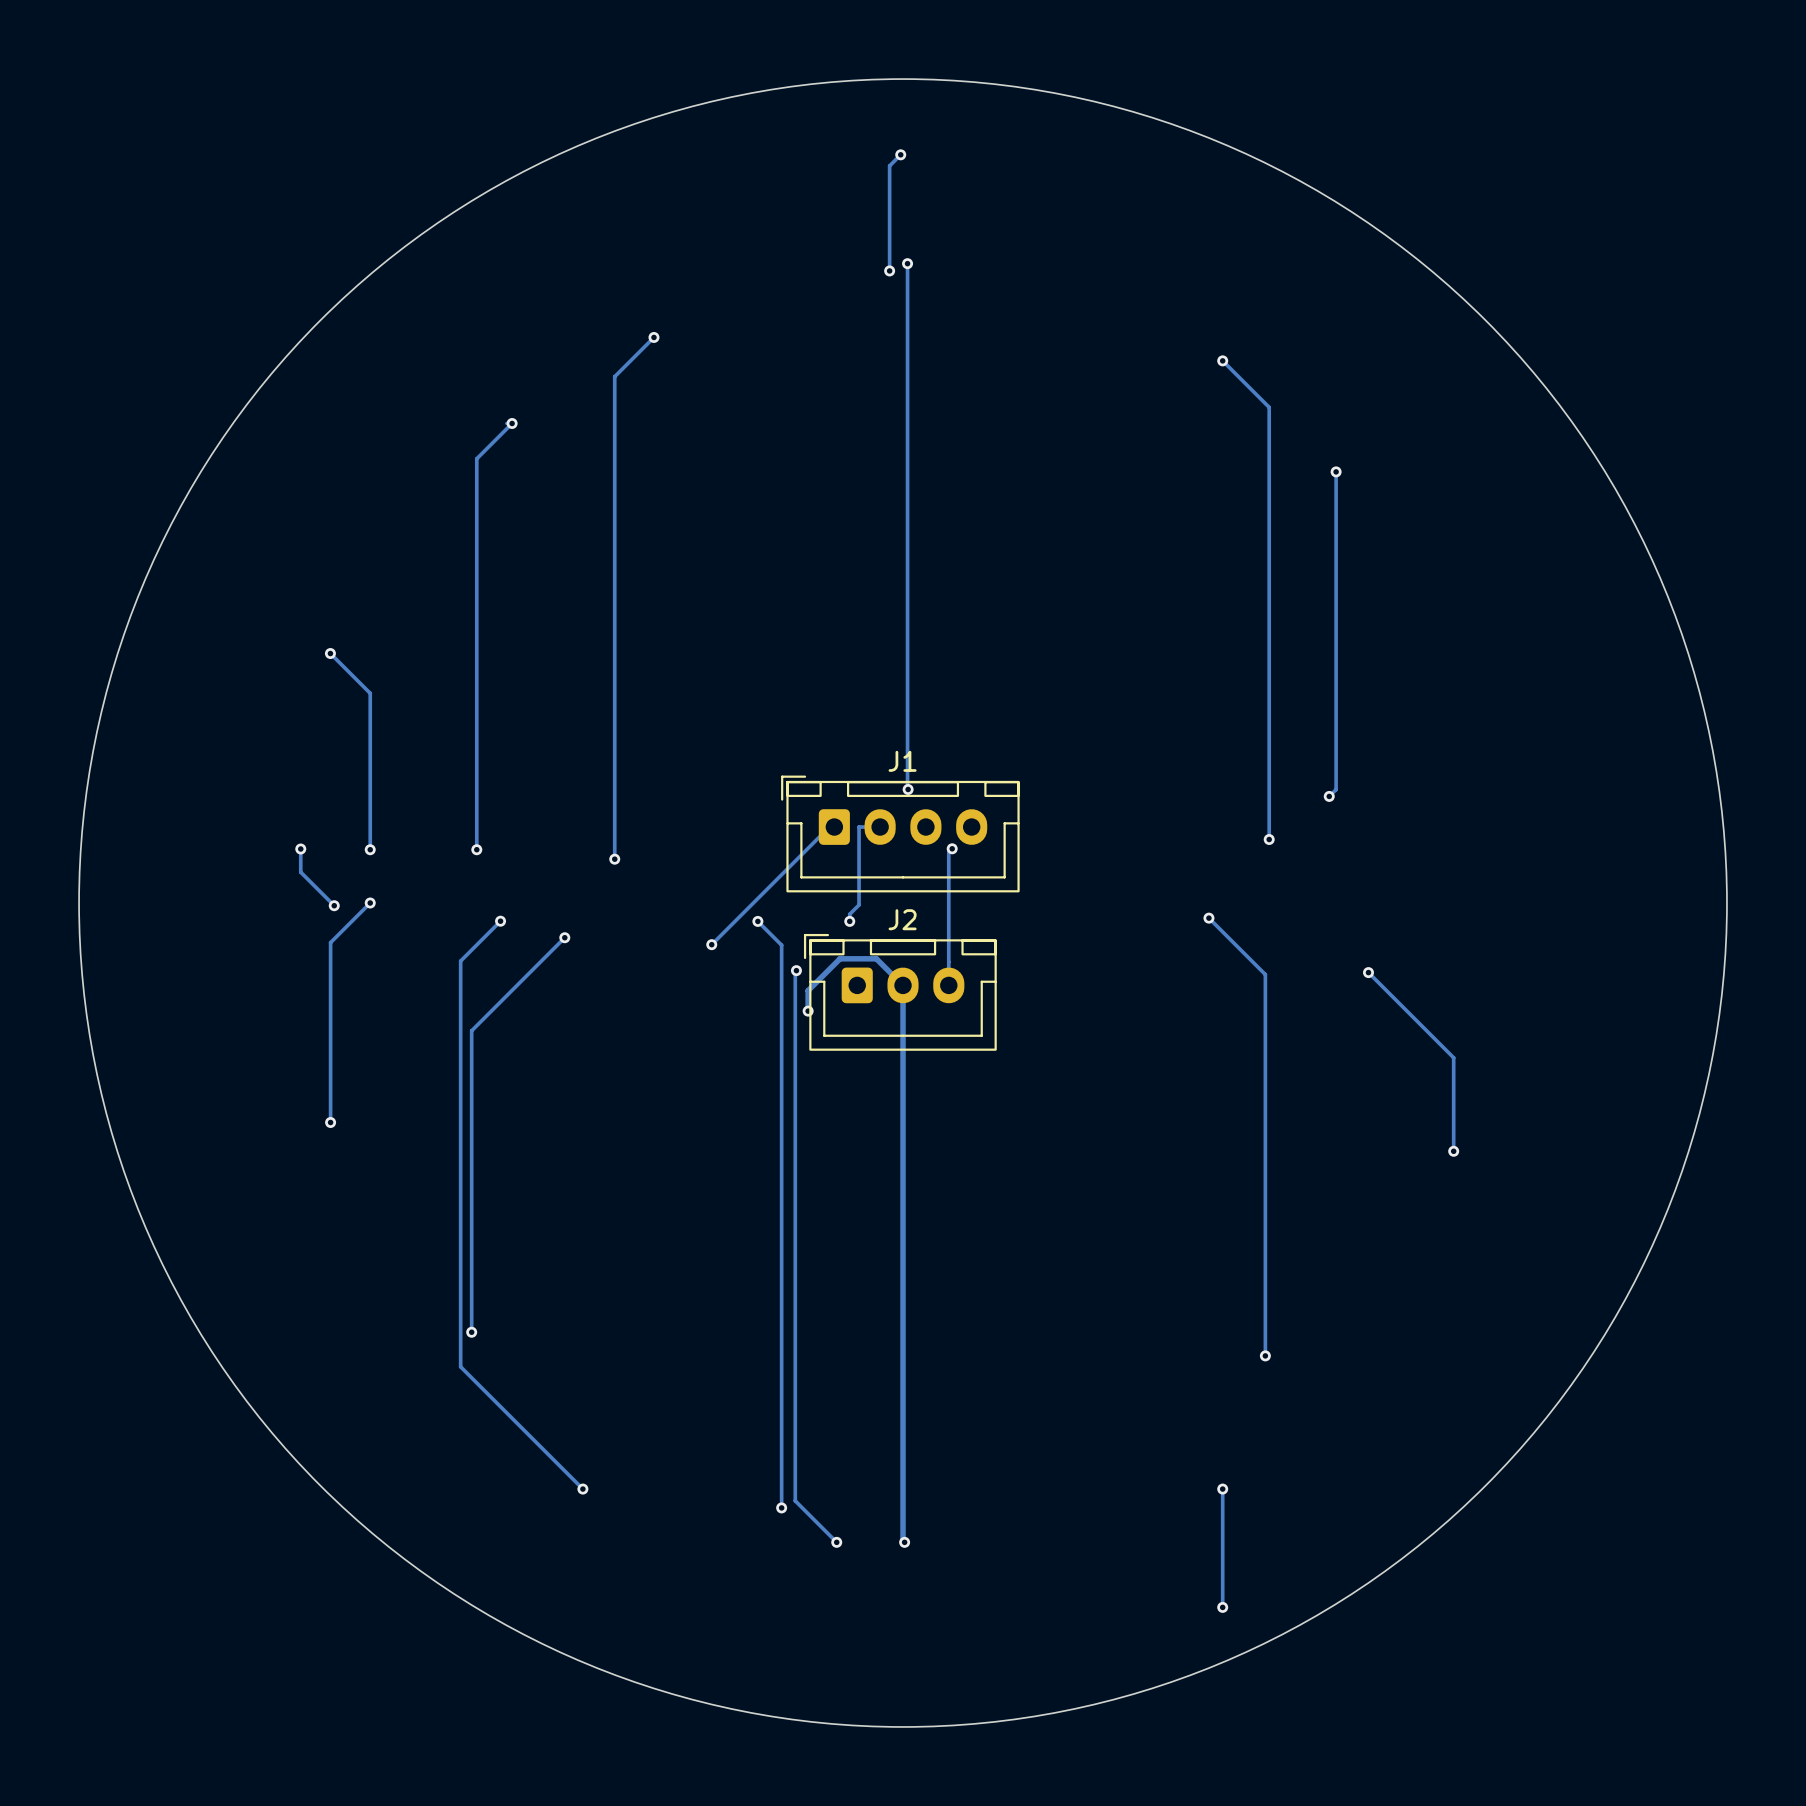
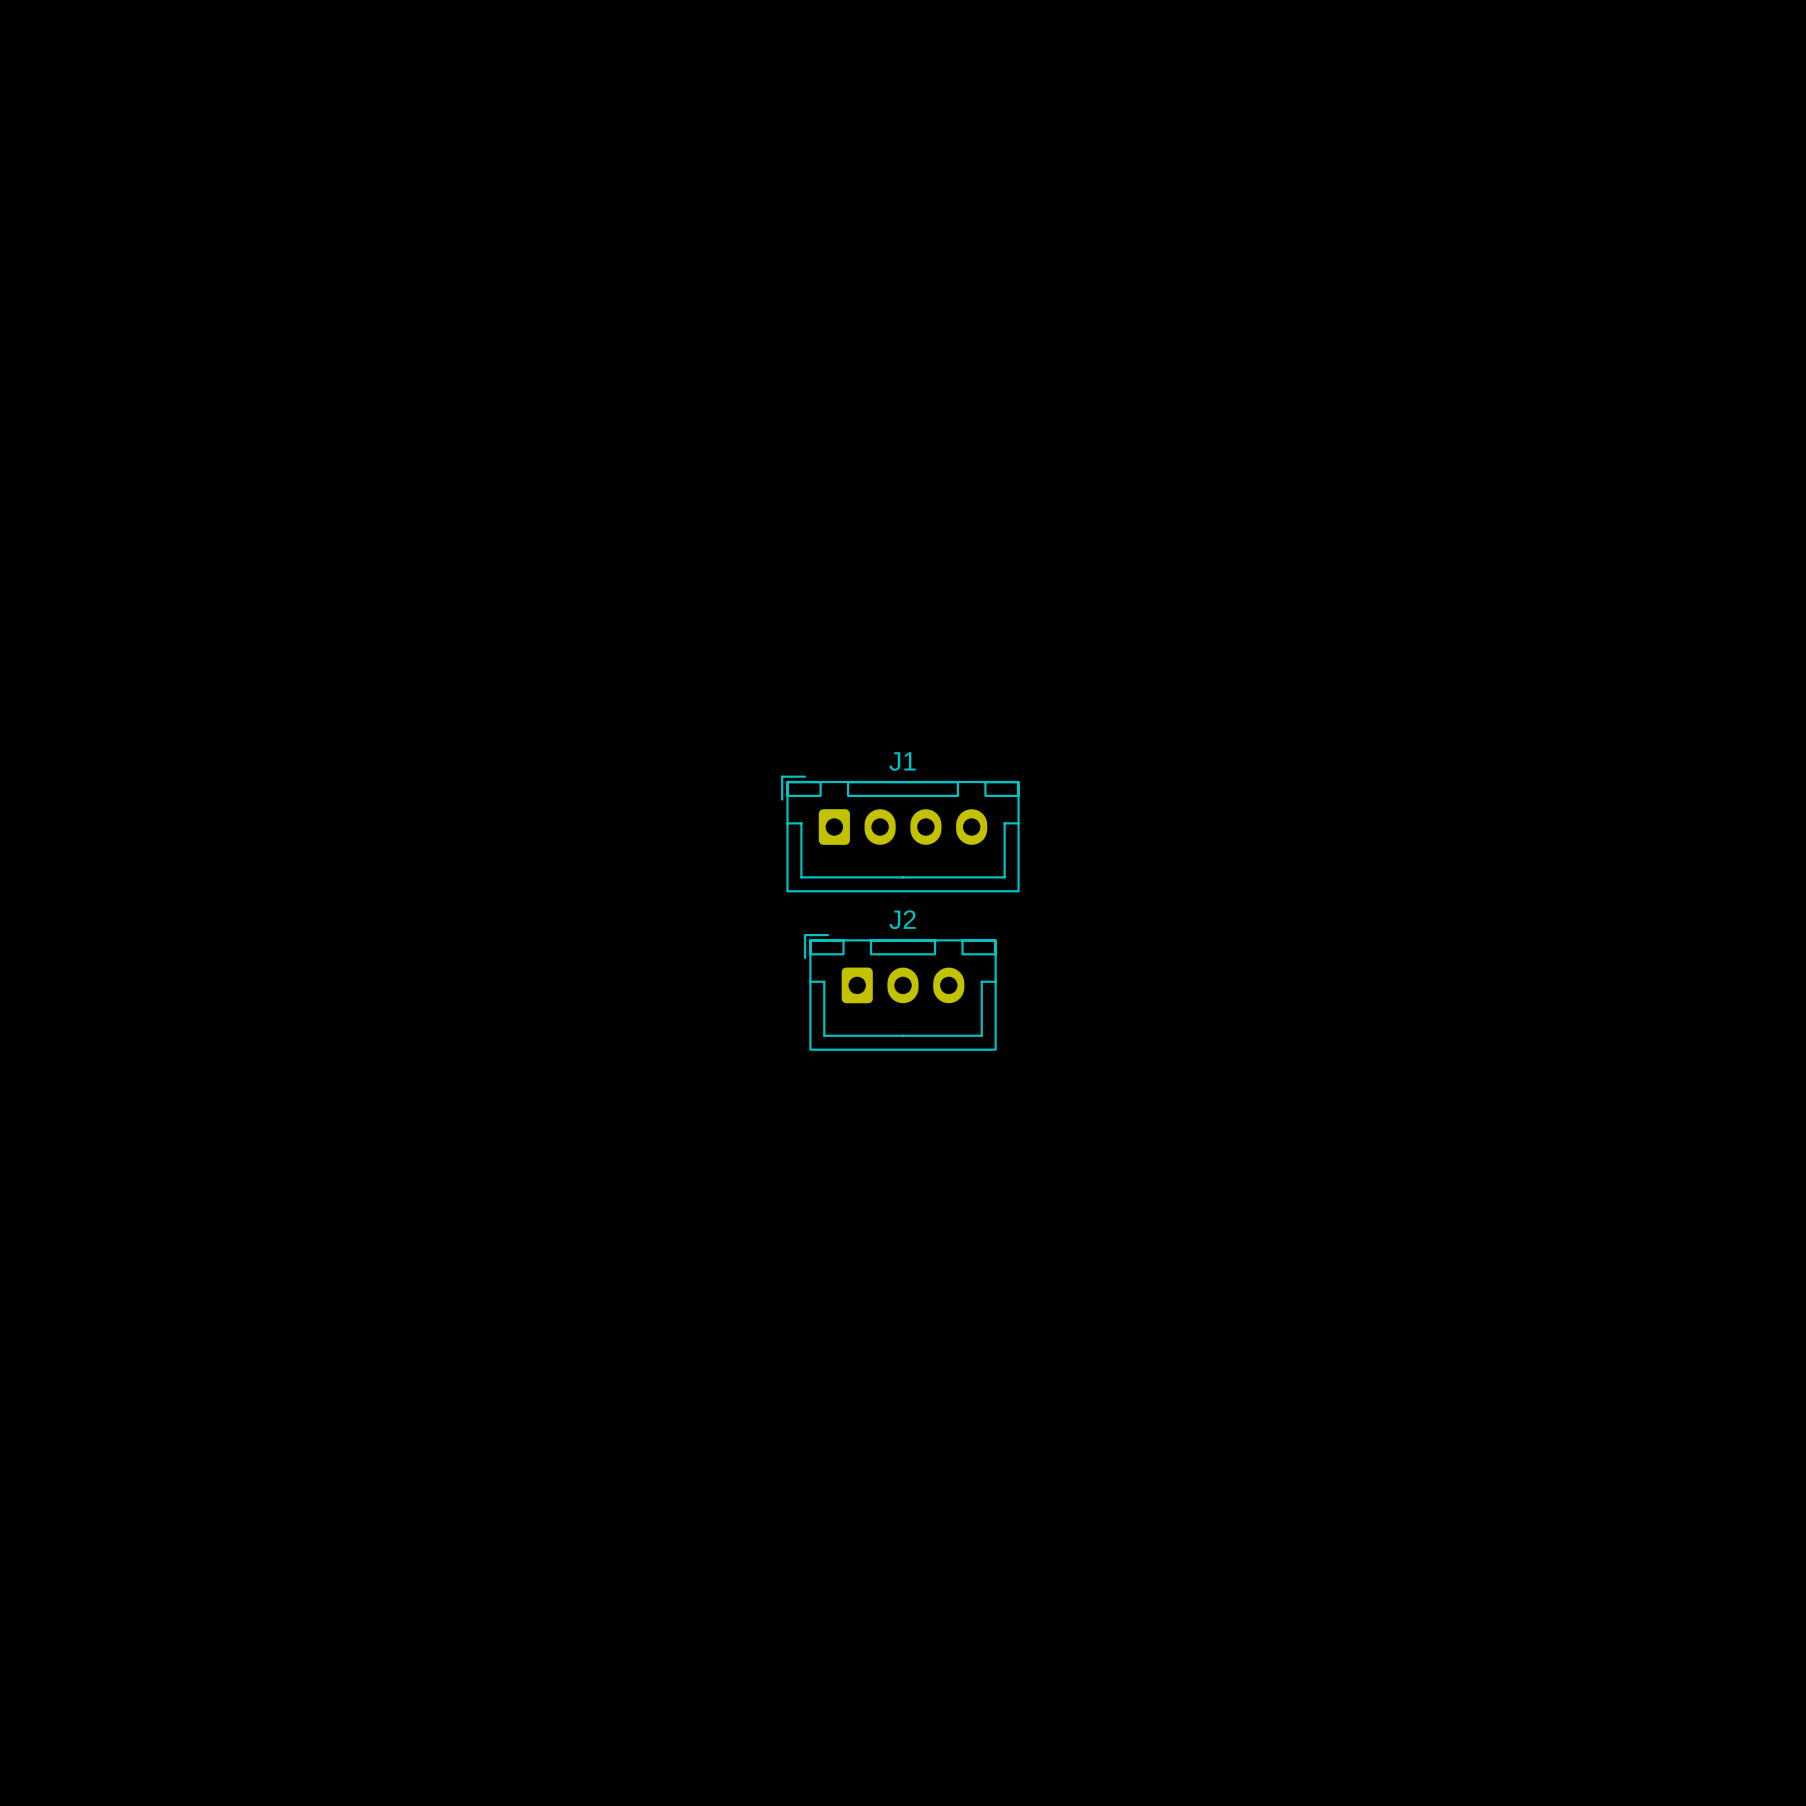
round board edge: [78, 78, 1728, 1728] -> none
track: (900, 154) (889, 165) (889, 270) -> none
via: (900, 154) -> none
track: (907, 263) (908, 789) -> none
via: (907, 263) -> none
via: (889, 270) -> none
track: (653, 337) (614, 376) (614, 861) -> none
via: (653, 337) -> none
track: (1222, 360) (1269, 407) (1269, 839) -> none
via: (1222, 360) -> none
track: (507, 423) (512, 423) (476, 458) (476, 849) -> none
via: (512, 423) -> none
track: (1336, 471) (1336, 789) (1329, 796) -> none
via: (1336, 471) -> none
track: (330, 653) (370, 693) (370, 849) -> none
via: (330, 653) -> none
via: (908, 789) -> none
via: (1329, 796) -> none
track: (834, 827) (829, 827) (711, 944) -> none
track: (880, 827) (859, 827) (859, 904) (849, 914) (849, 921) -> none
via: (1269, 839) -> none
track: (952, 848) (948, 852) (948, 985) -> none
via: (952, 848) -> none
track: (300, 849) (300, 872) (334, 905) -> none
via: (300, 849) -> none
via: (370, 849) -> none
via: (476, 849) -> none
via: (614, 859) -> none
track: (370, 903) (330, 942) (330, 1122) -> none
via: (370, 903) -> none
via: (334, 905) -> none
track: (1208, 918) (1265, 974) (1265, 1355) -> none
via: (1208, 918) -> none
track: (500, 921) (460, 961) (460, 1366) (582, 1489) -> none
via: (500, 921) -> none
track: (757, 921) (781, 945) (781, 1507) -> none
via: (757, 921) -> none
via: (849, 921) -> none
track: (564, 937) (471, 1030) (471, 1332) -> none
via: (564, 937) -> none
via: (711, 944) -> none
track: (796, 970) (795, 1500) (836, 1542) -> none
via: (796, 970) -> none
track: (1368, 972) (1453, 1057) (1453, 1151) -> none
via: (1368, 972) -> none
track: (808, 1011) (808, 990) (840, 958) (876, 958) (903, 985) (903, 1540) (904, 1542) -> none
via: (808, 1011) -> none
via: (330, 1122) -> none
via: (1453, 1151) -> none
via: (471, 1332) -> none
via: (1265, 1355) -> none
via: (582, 1489) -> none
track: (1222, 1489) (1222, 1607) -> none
via: (1222, 1489) -> none
via: (781, 1507) -> none
via: (836, 1542) -> none
via: (904, 1542) -> none
via: (1222, 1607) -> none

